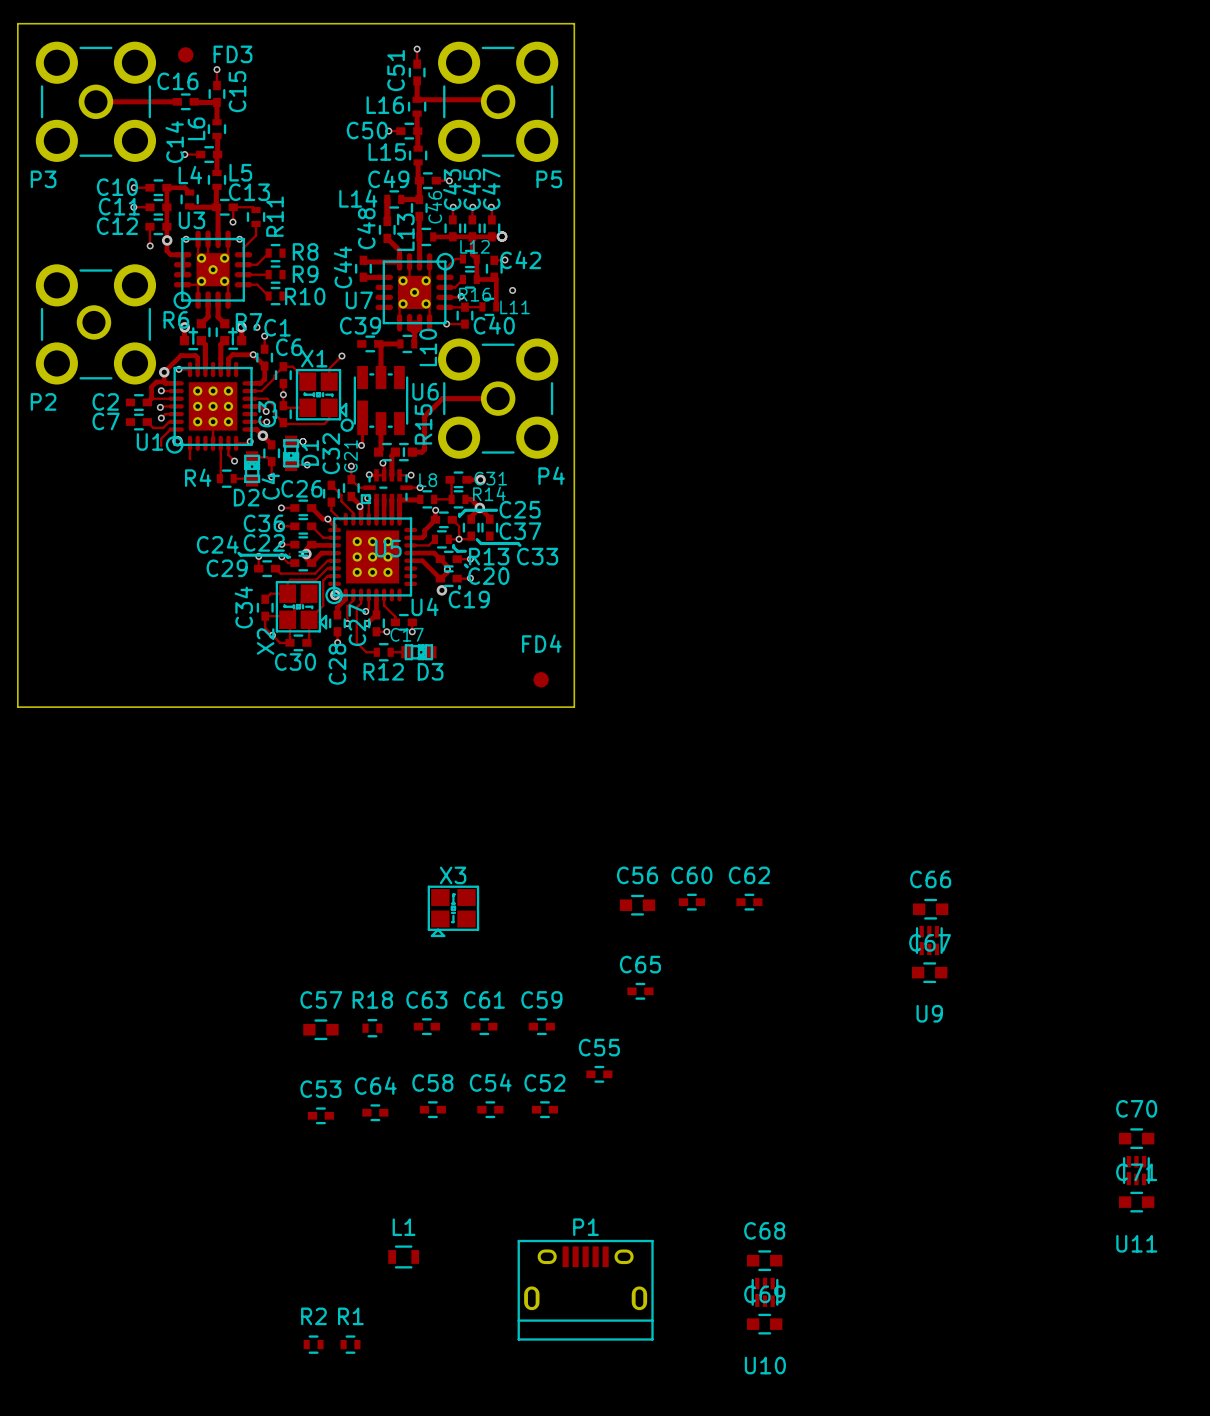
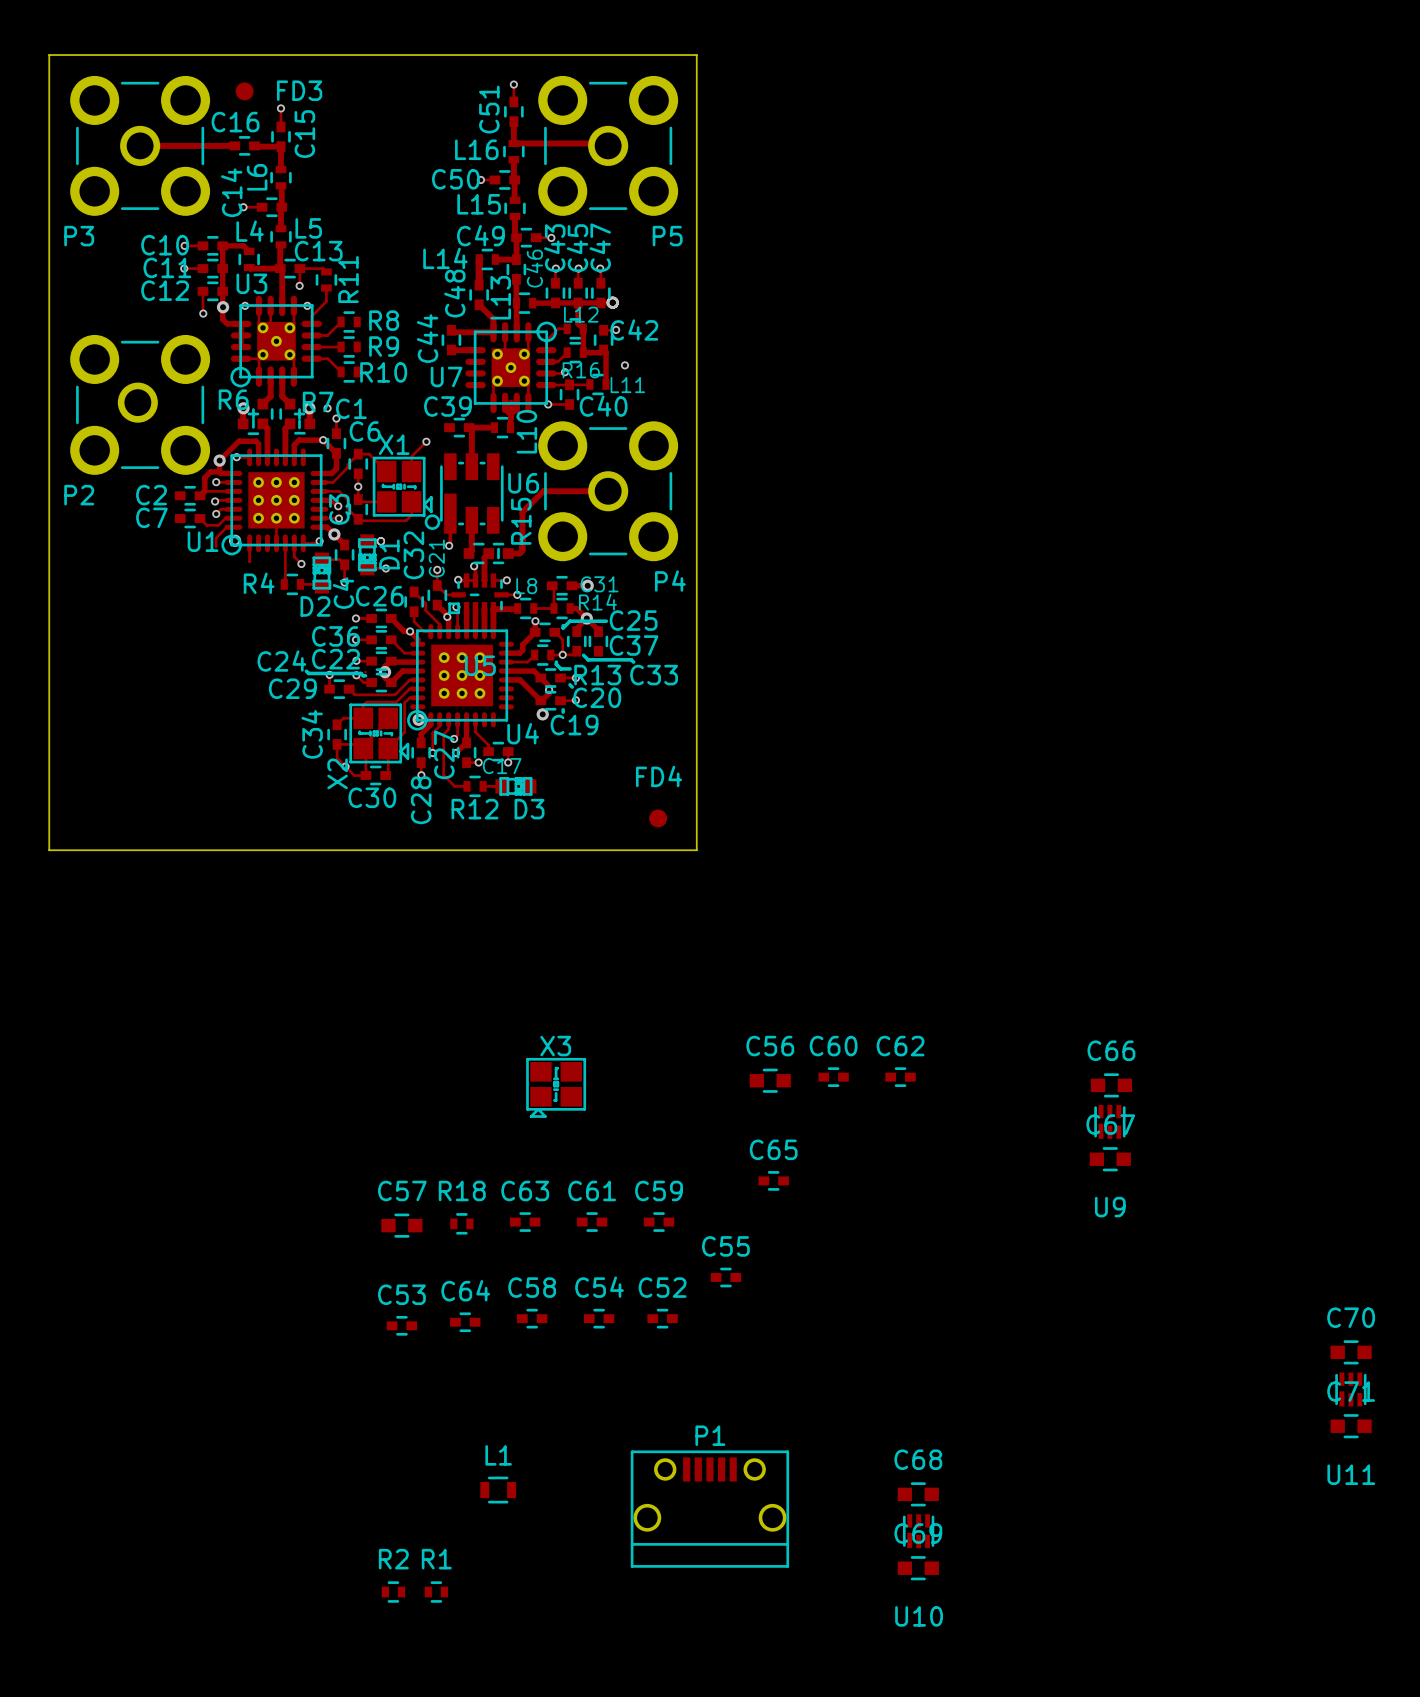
P1 footprint: [517, 1239, 654, 1341] -> [630, 1450, 790, 1568]

